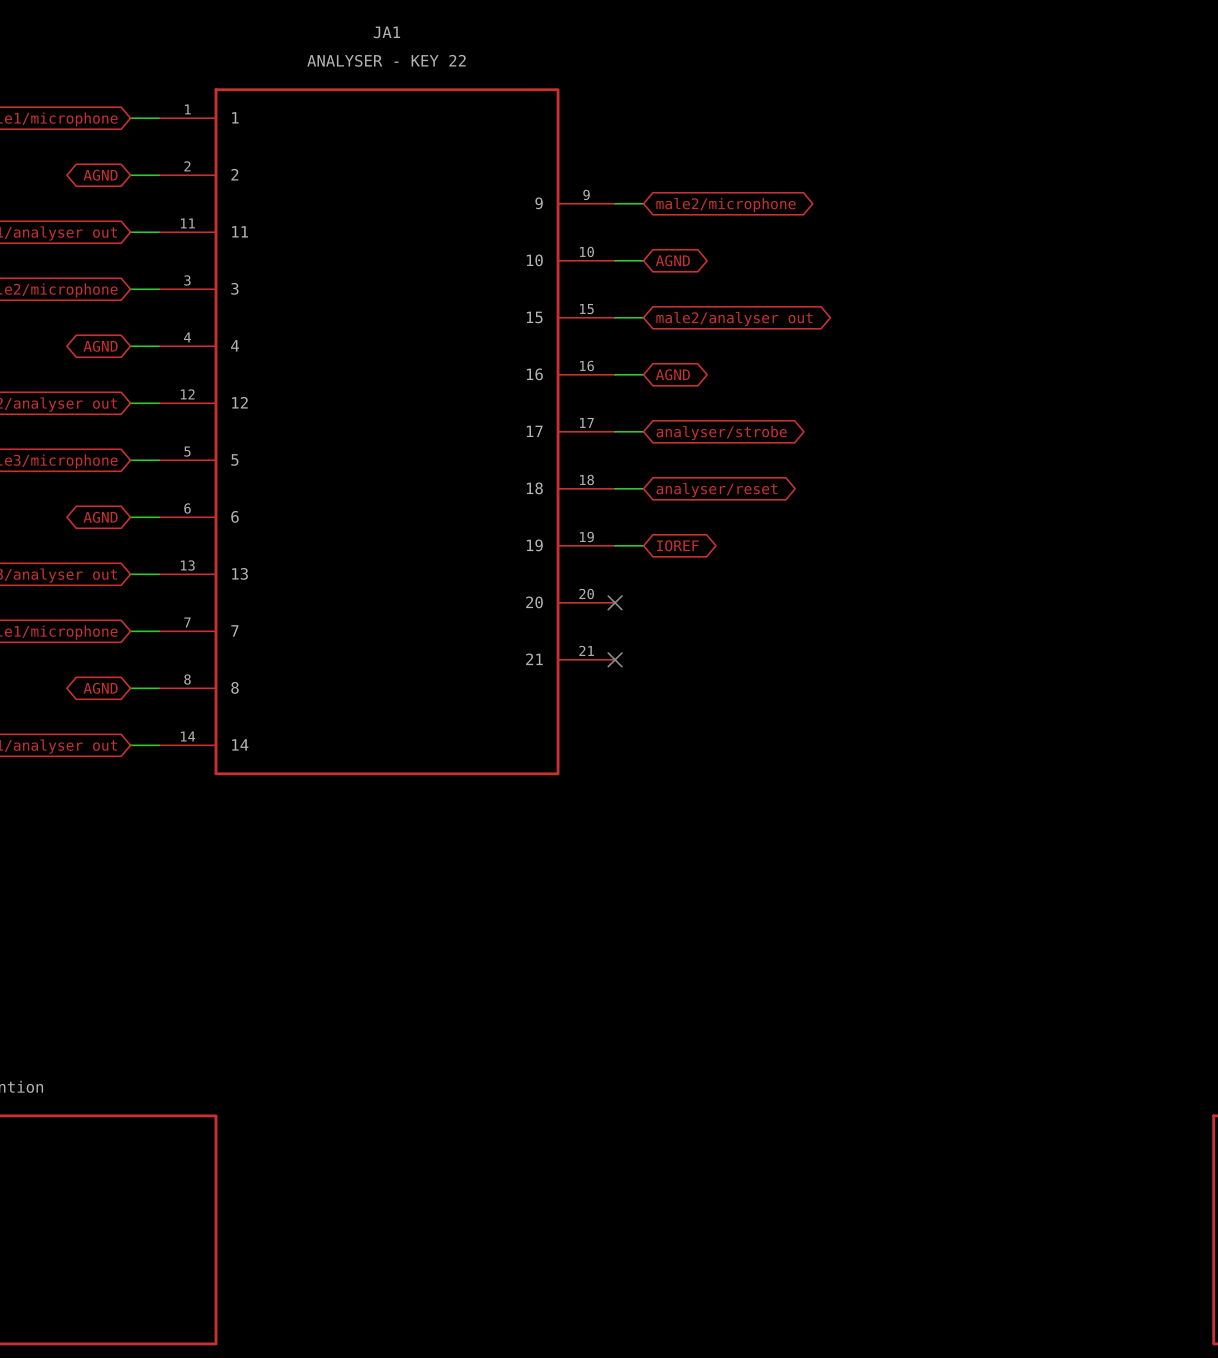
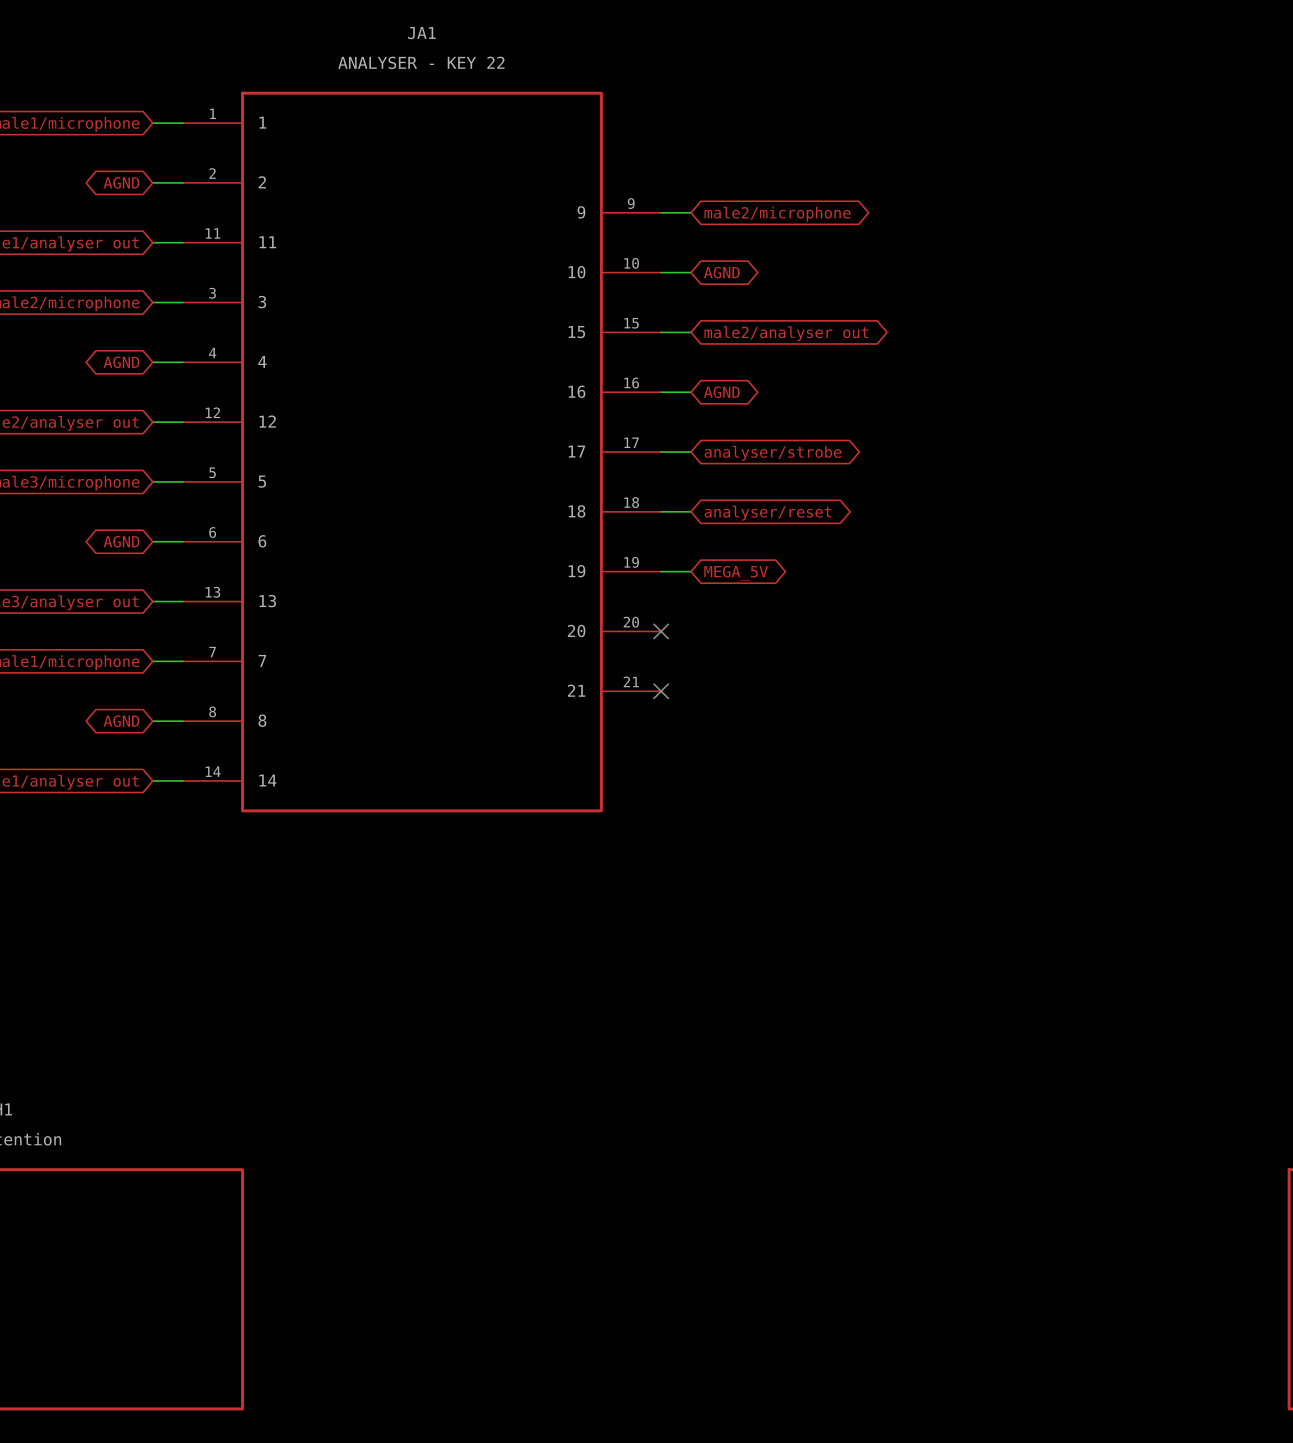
global label: IOREF (677, 545) -> MEGA_5V (736, 573)

